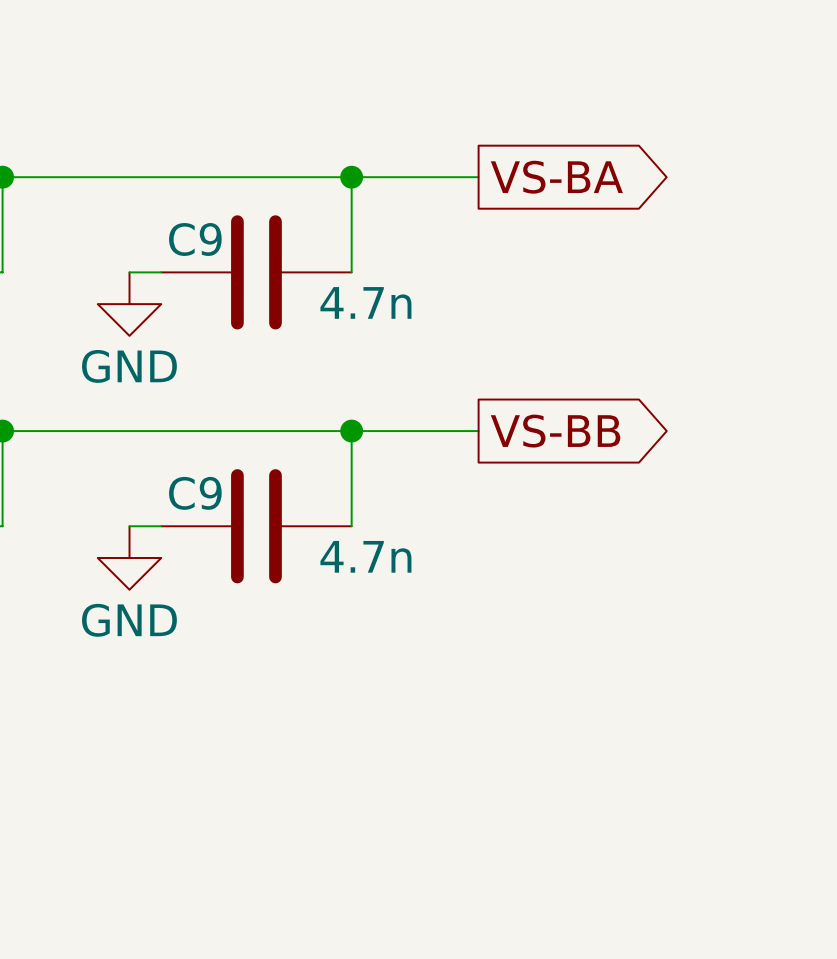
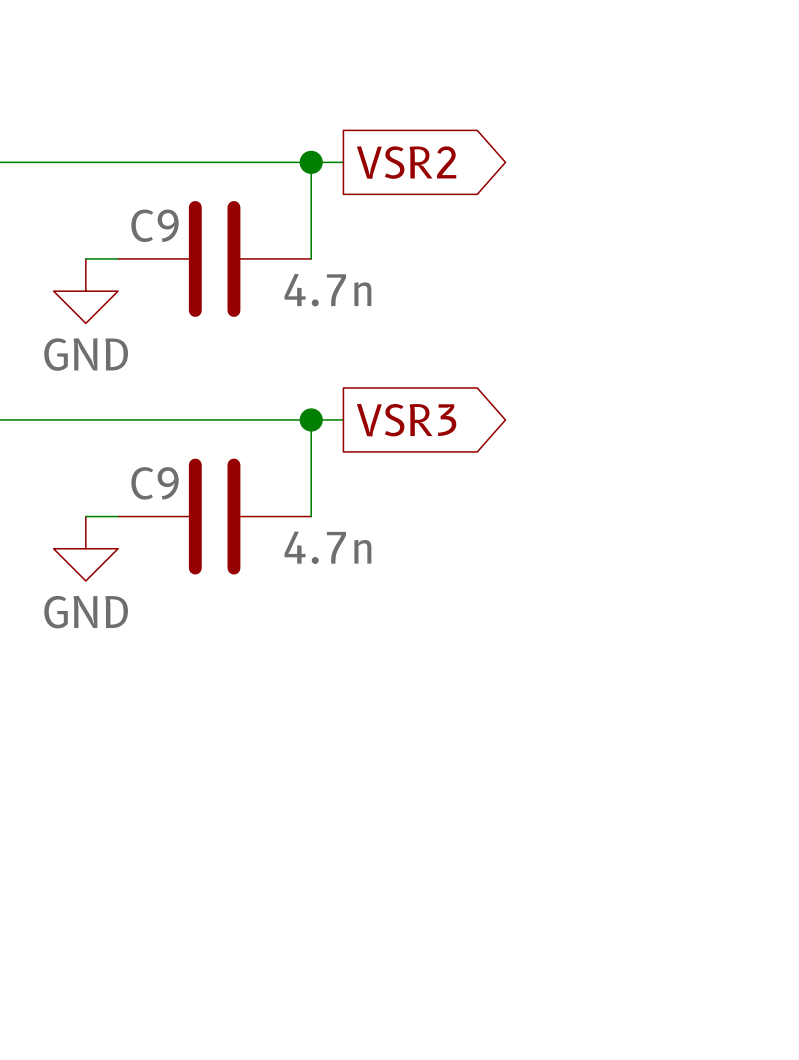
wire: (383, 177) (478, 177) -> none
global label: none -> VSR2 (406, 162)
global label: VS-BA (556, 177) -> none
wire: (383, 431) (478, 431) -> none
global label: none -> VSR3 (406, 420)
global label: VS-BB (555, 431) -> none

